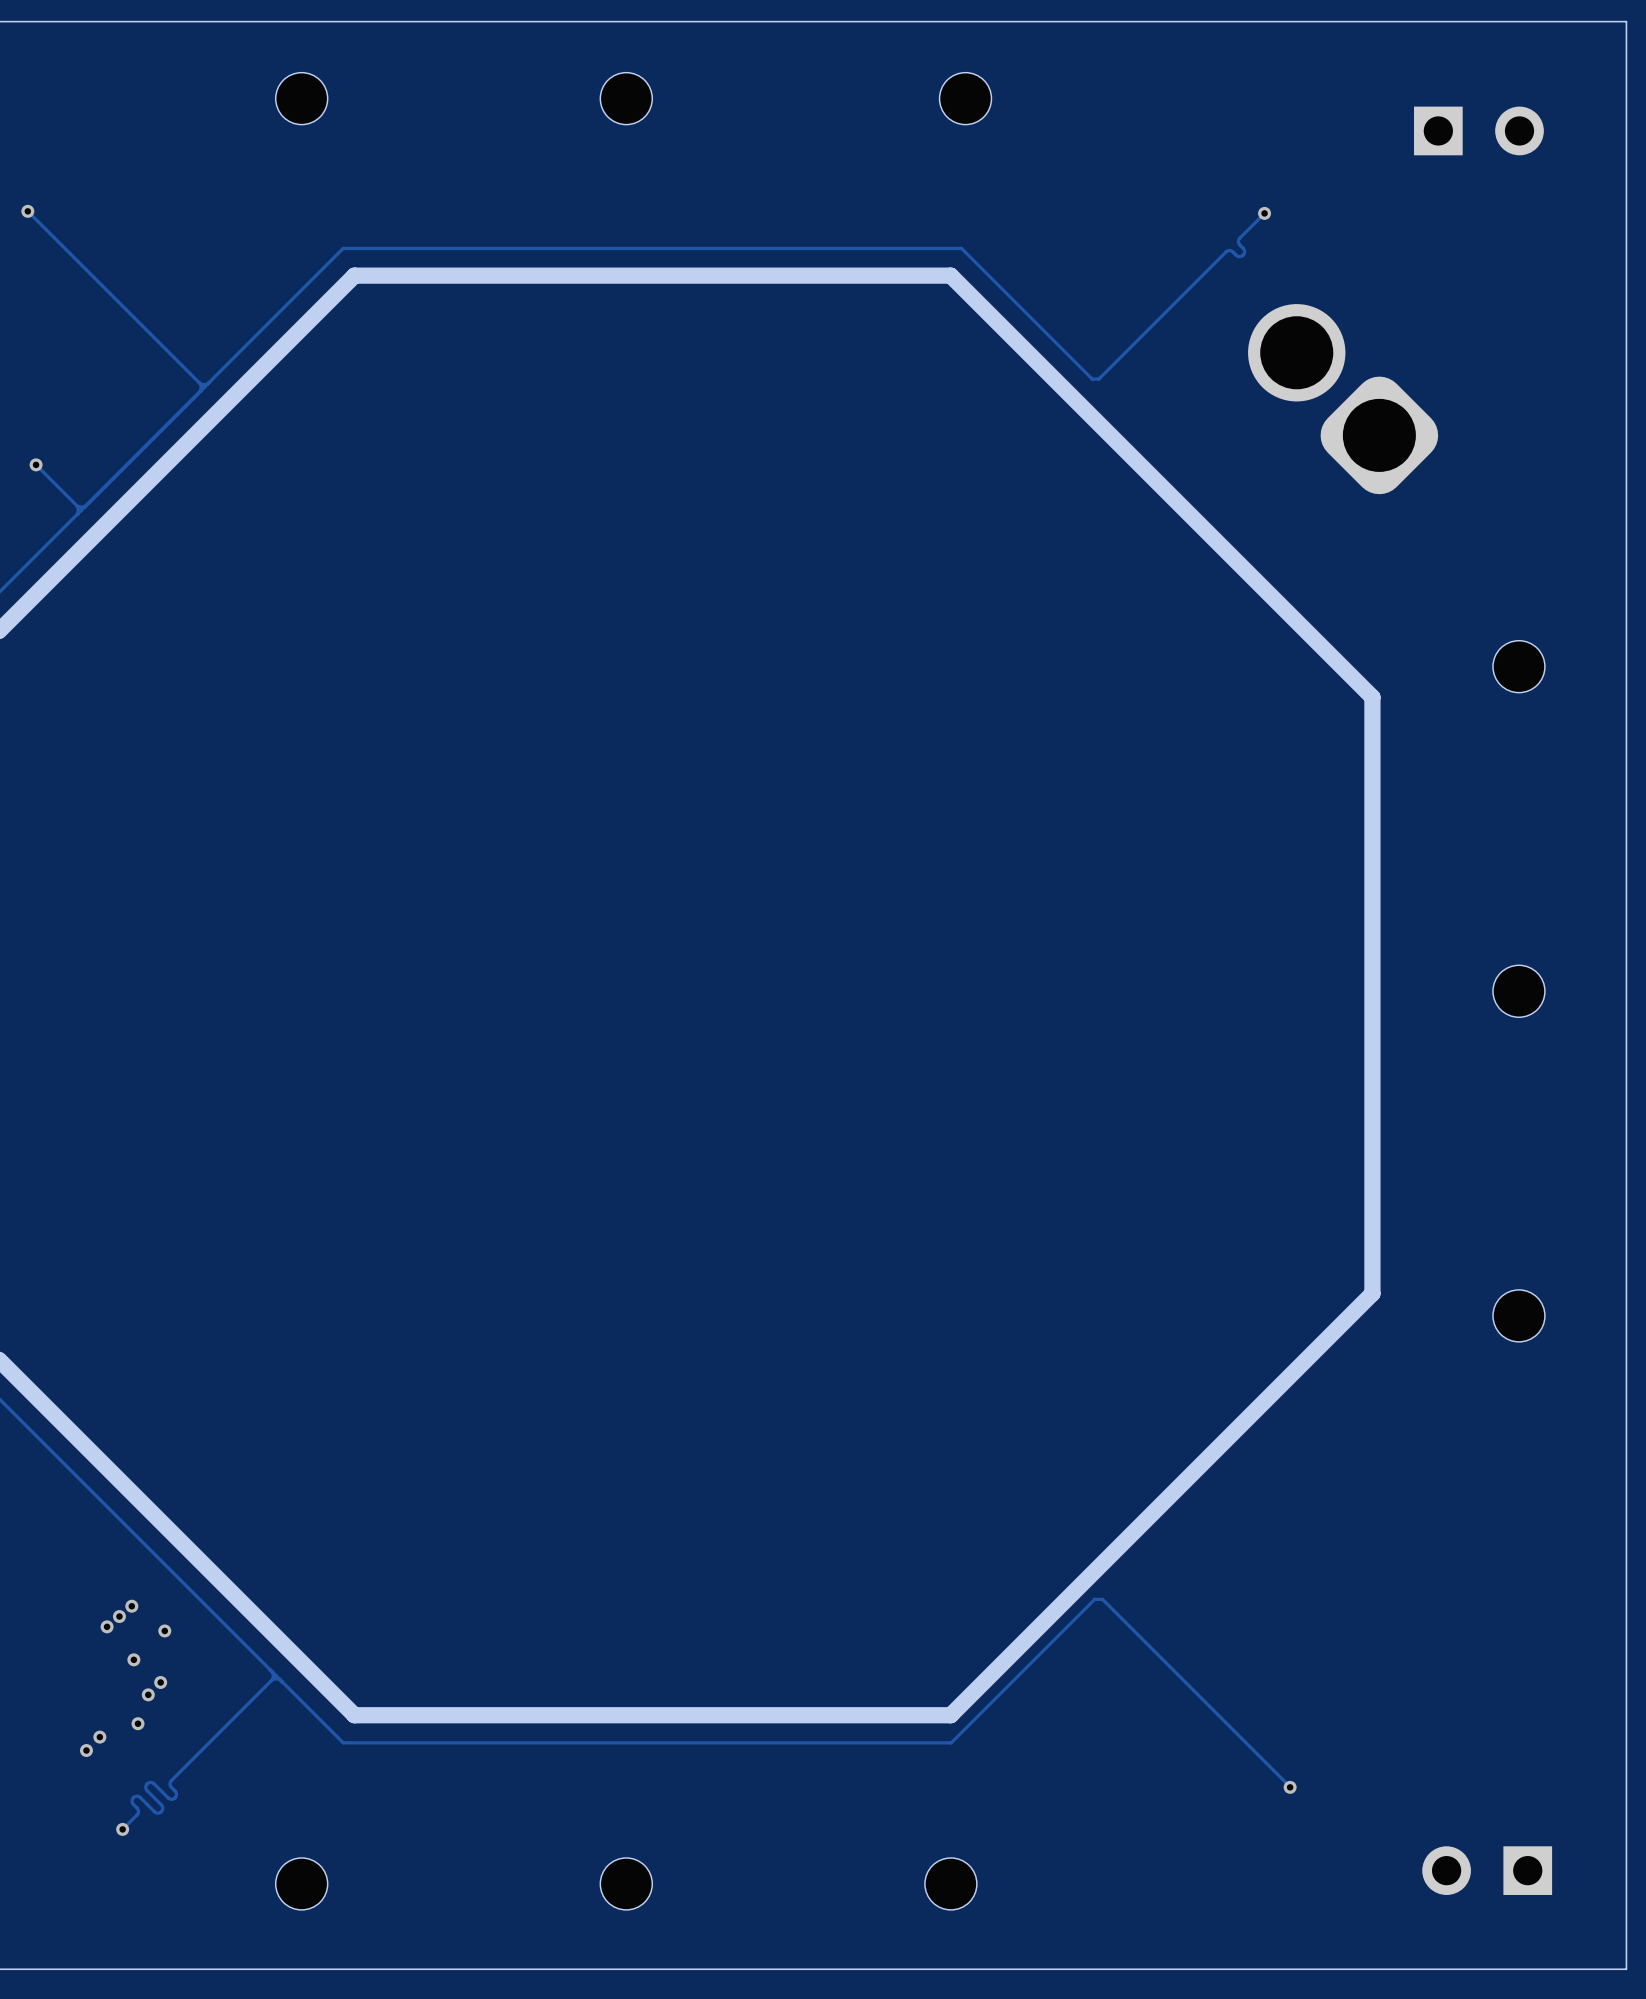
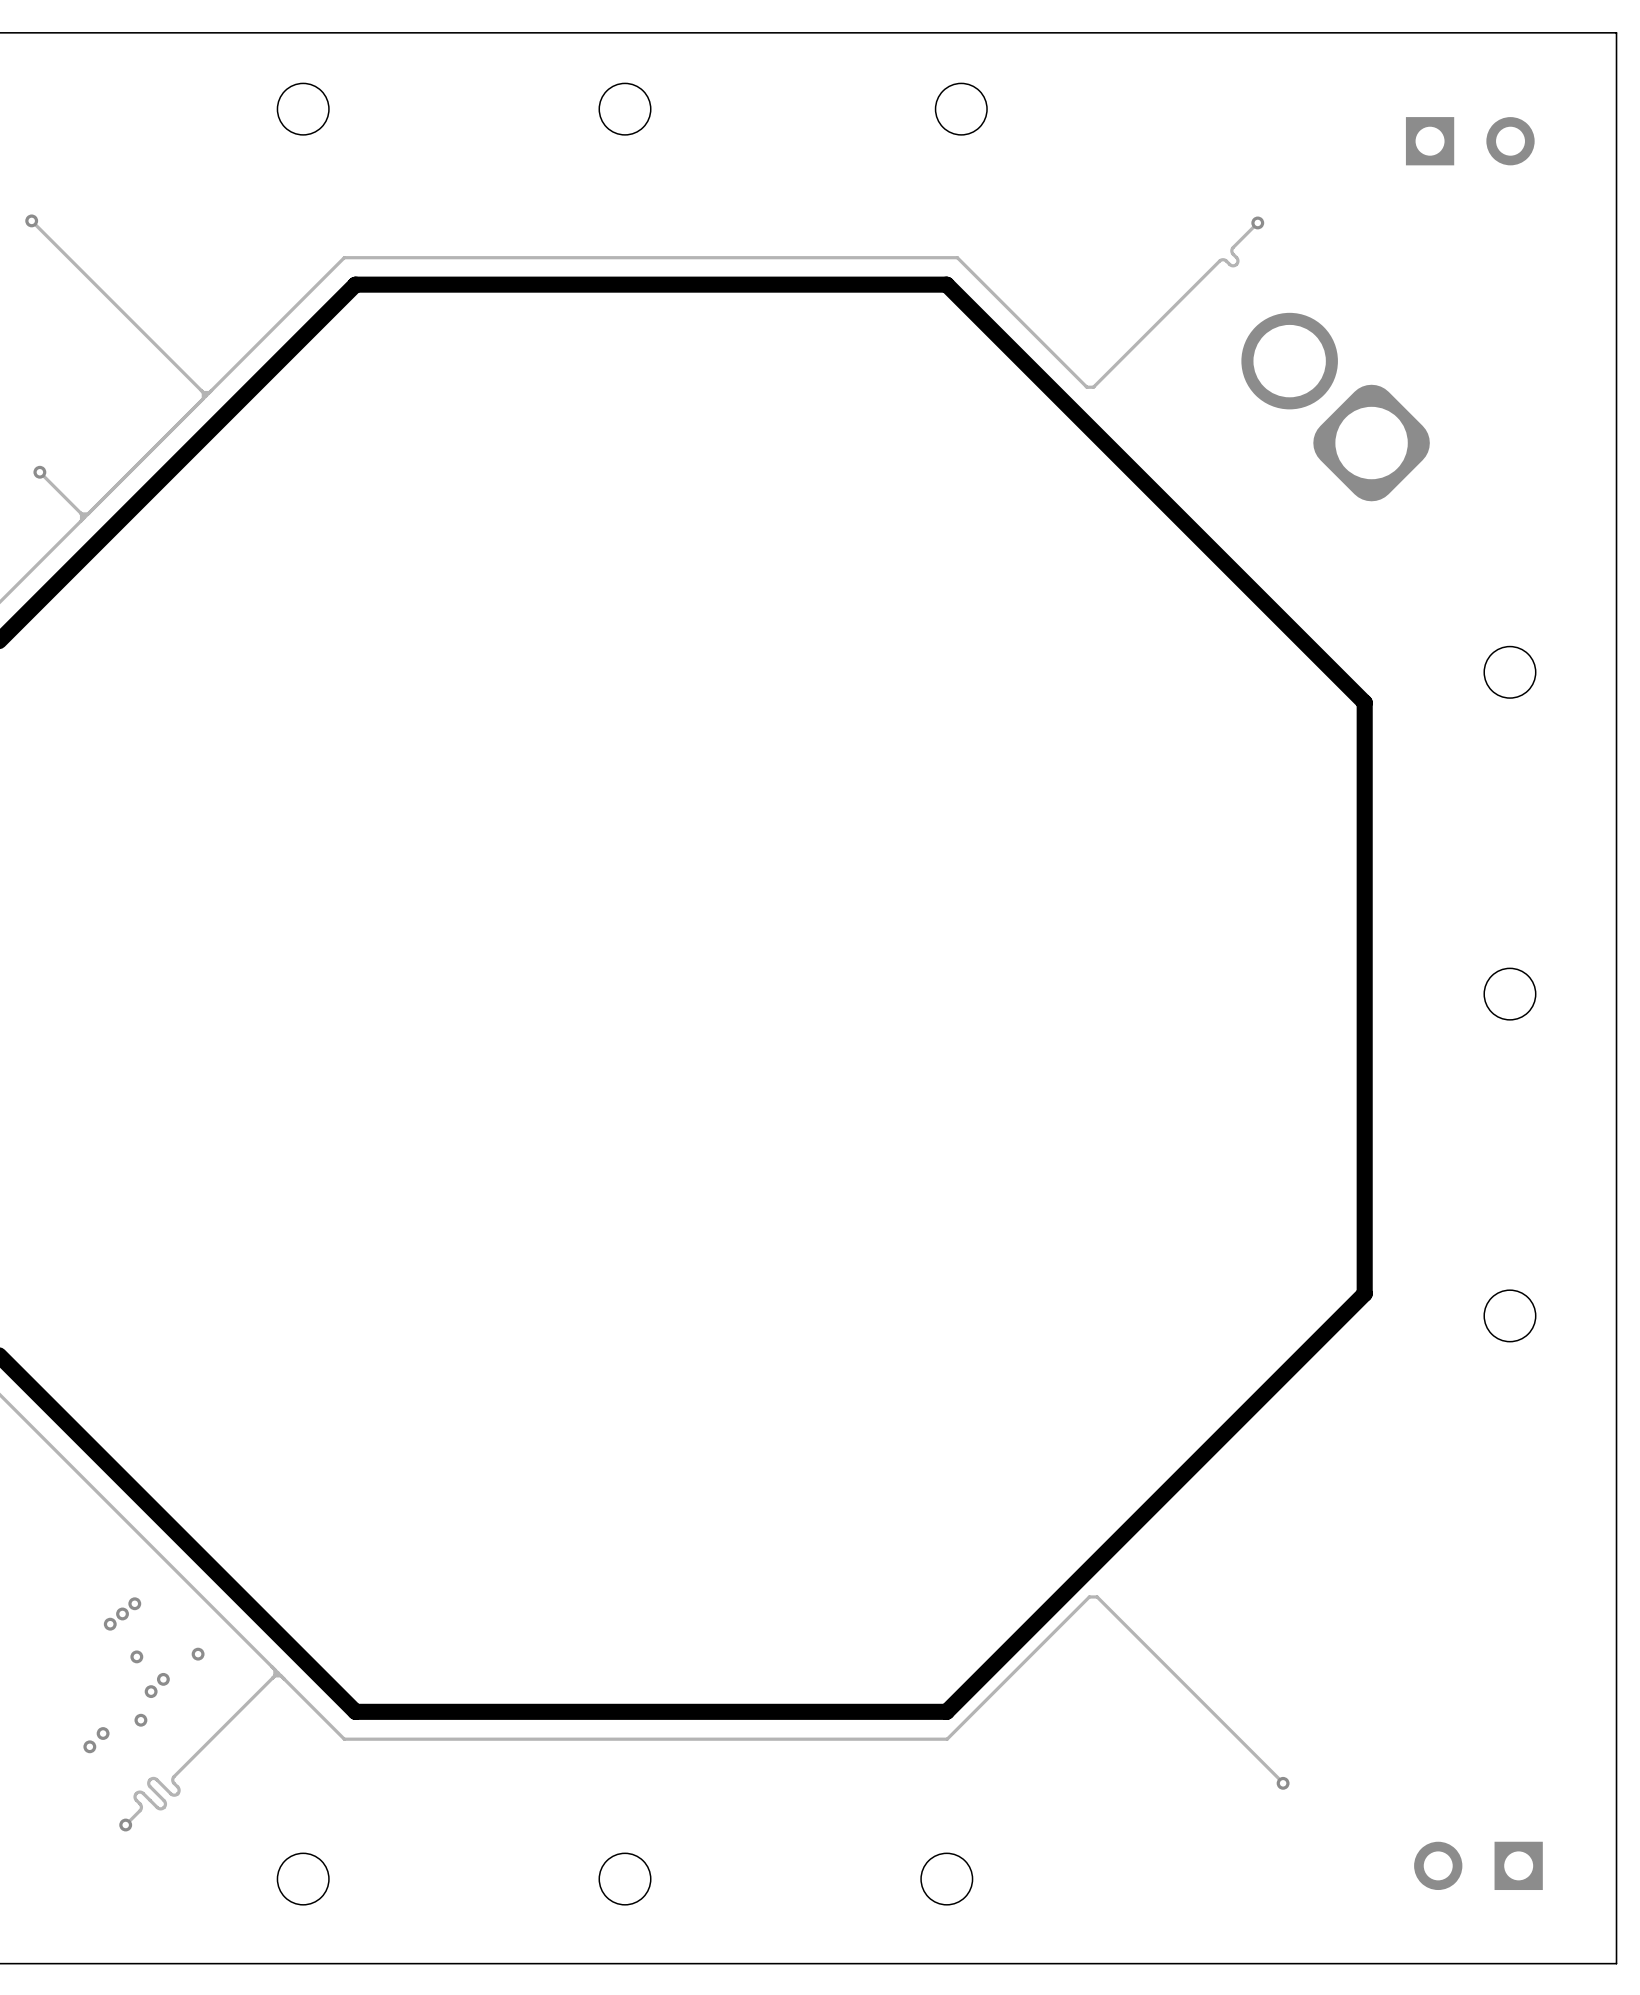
via position: (164, 1630) -> (198, 1654)

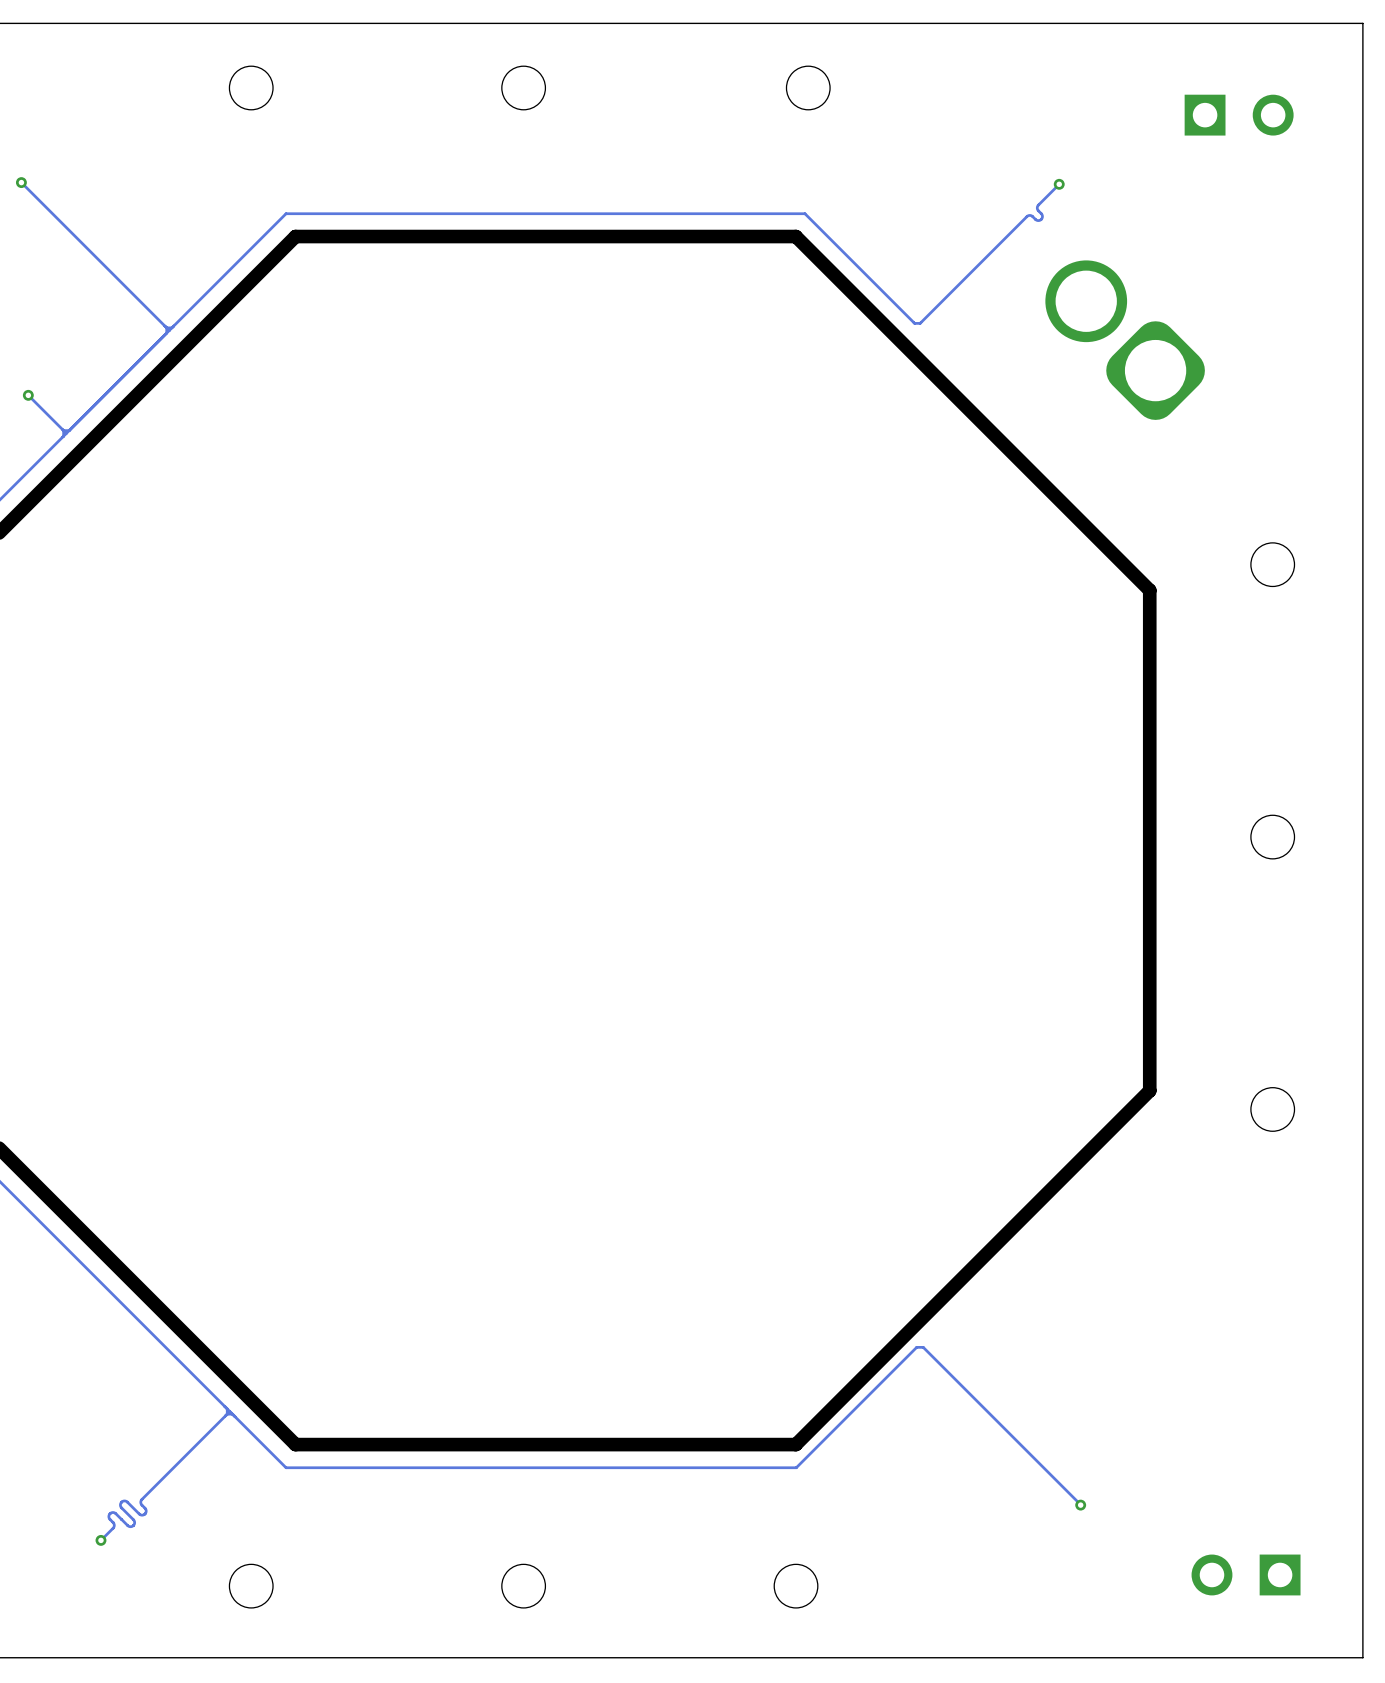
via: (134, 1603) -> none
via: (122, 1613) -> none
via: (110, 1624) -> none
via: (198, 1654) -> none
via: (136, 1656) -> none
via: (163, 1679) -> none
via: (151, 1691) -> none
via: (140, 1720) -> none
via: (103, 1733) -> none
via: (89, 1746) -> none

